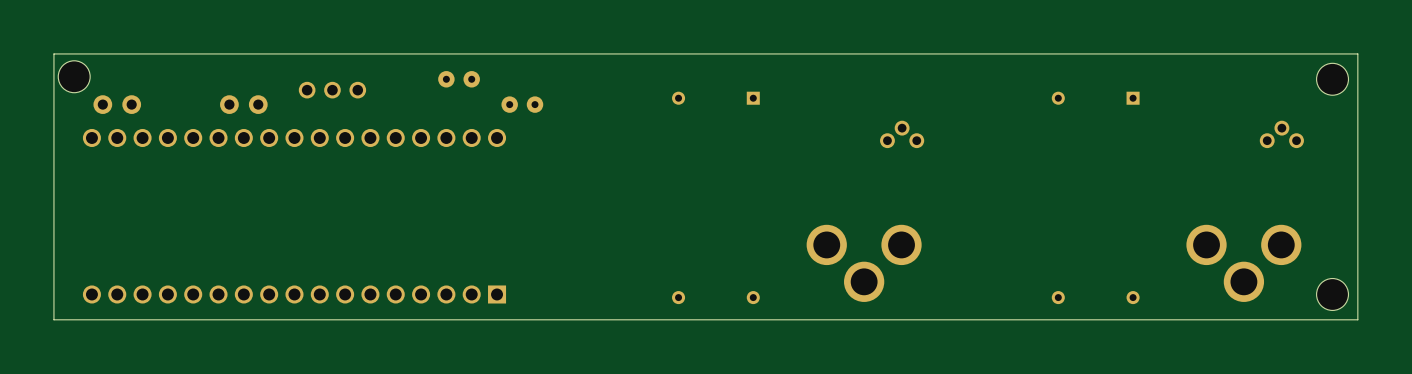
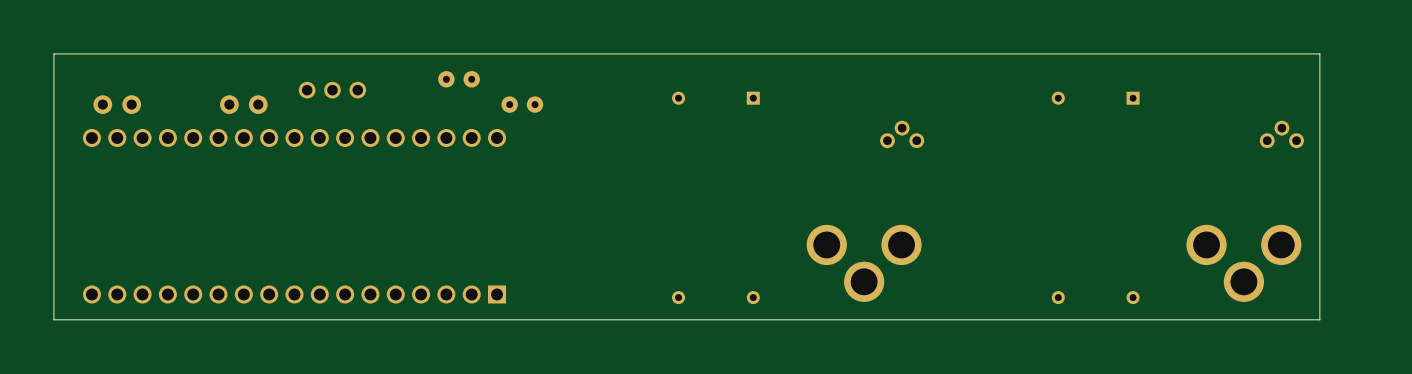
board edge: (1319, 53) (1357, 53) (1357, 319) (1319, 319) -> (1319, 53) (1319, 319)
hole: (74, 76) -> none
hole: (1332, 79) -> none
hole: (1332, 294) -> none

